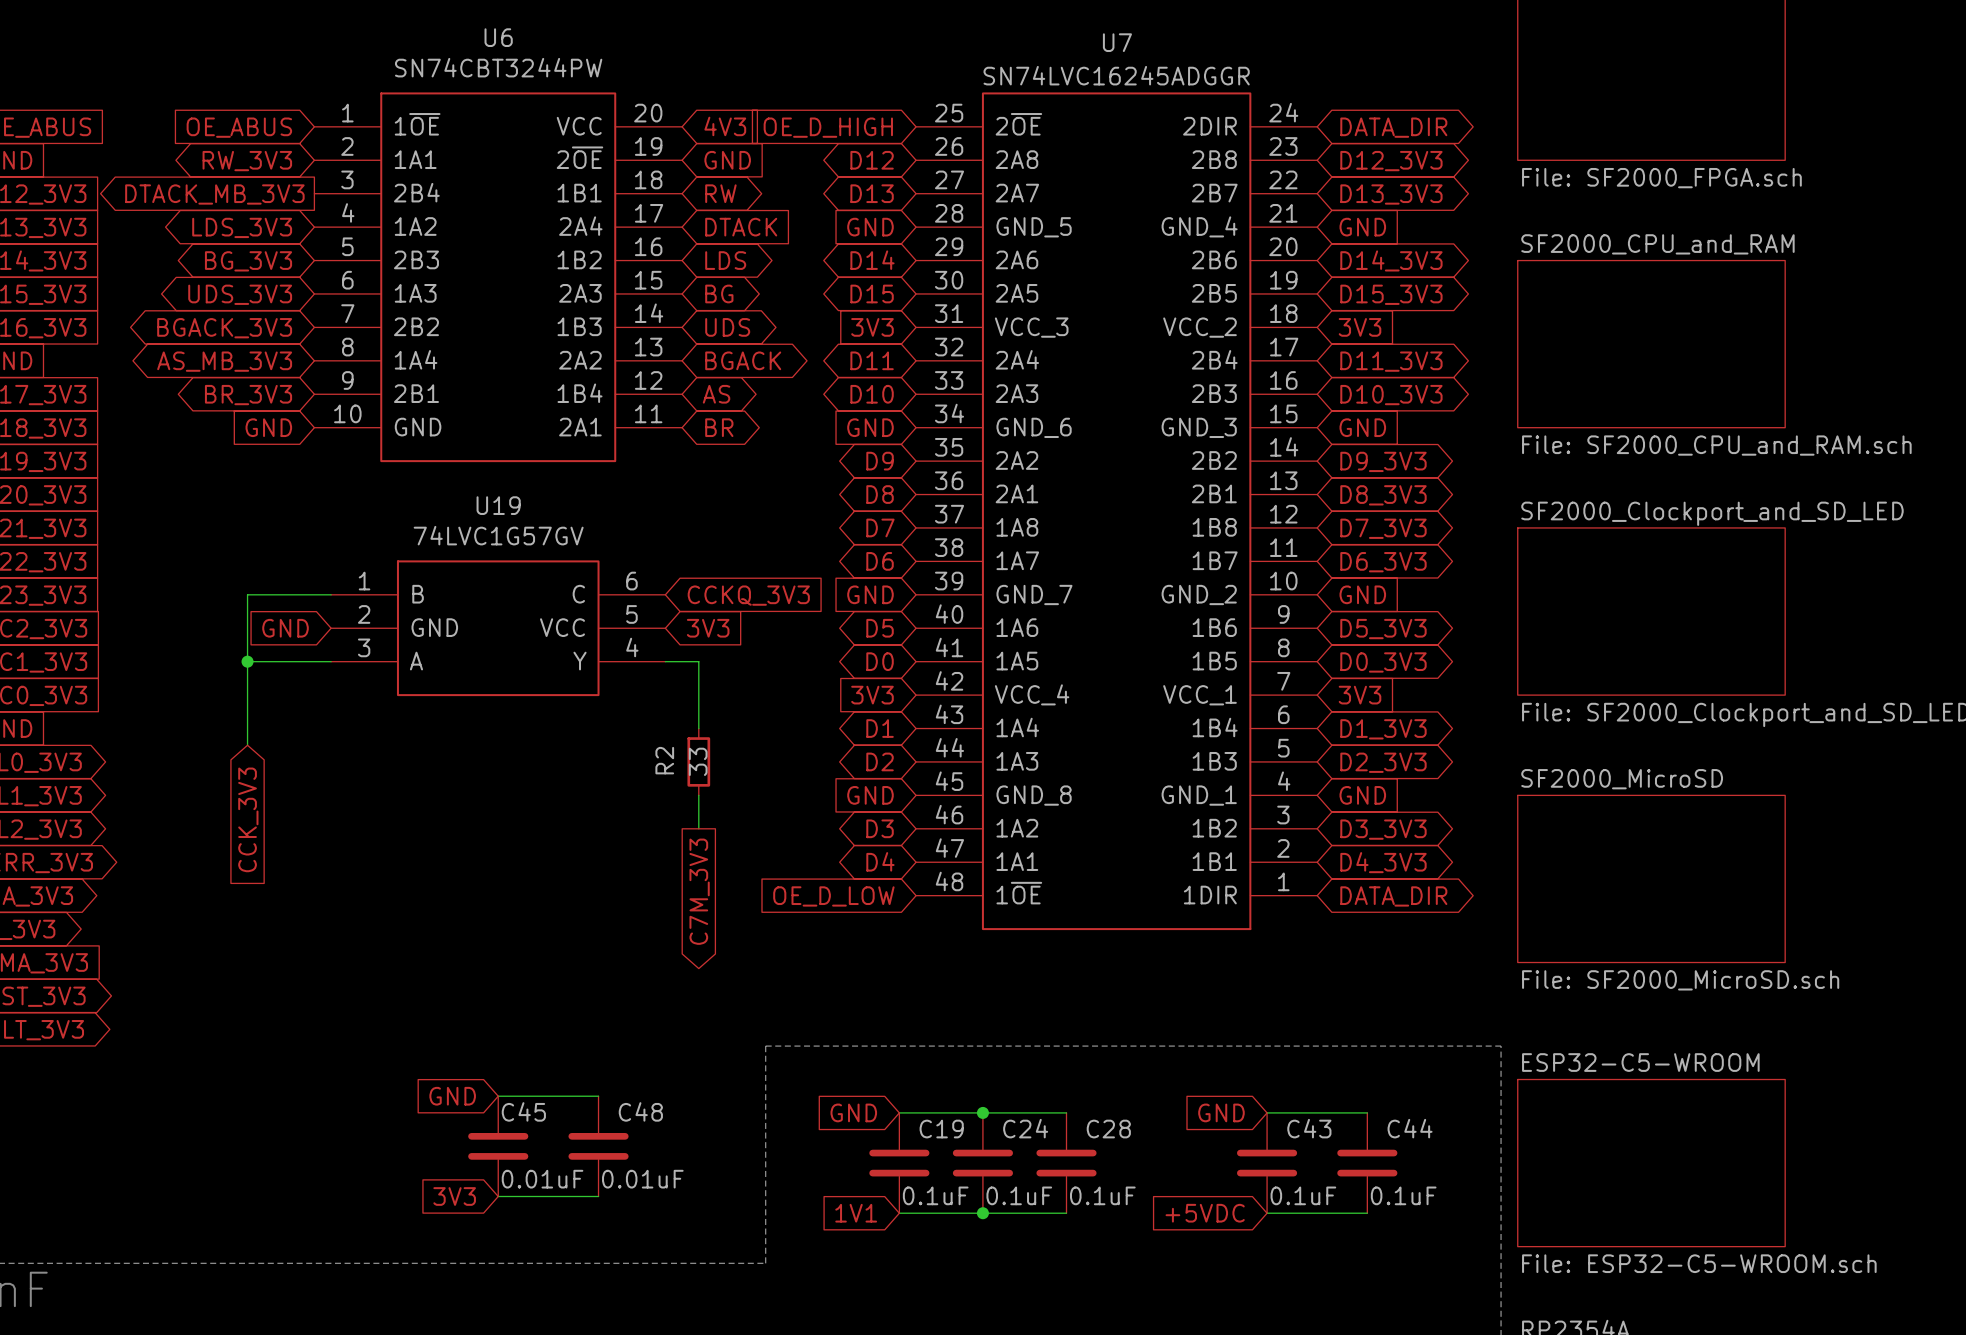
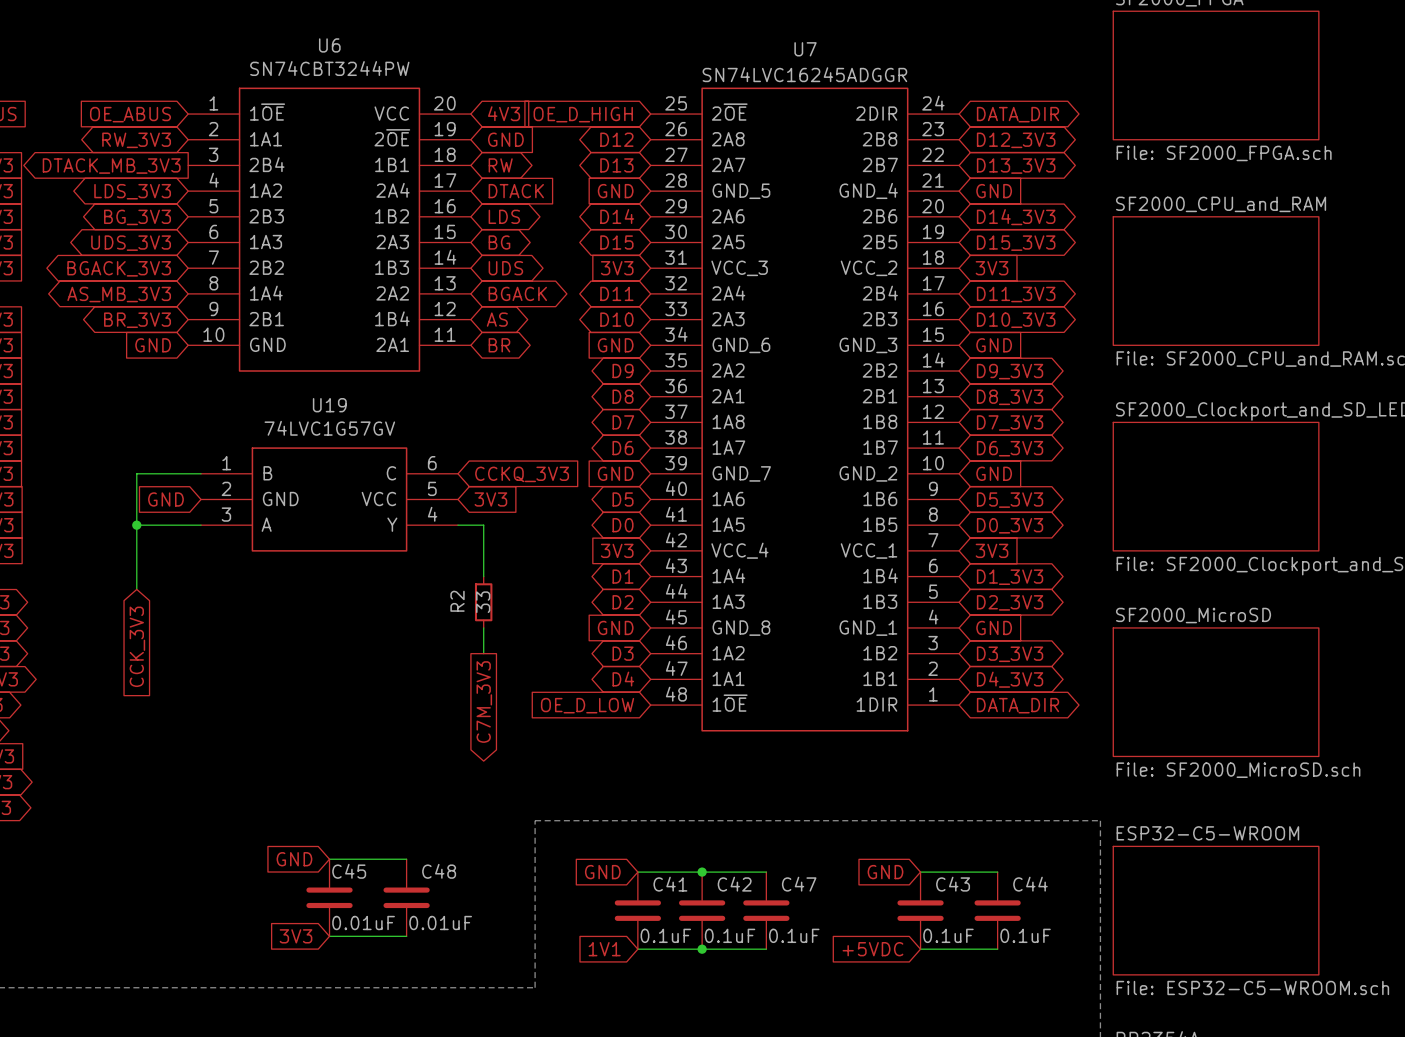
C24 name: C24 (1025, 1128) -> C42 (734, 884)
C19 name: C19 (941, 1129) -> C41 (670, 884)
C28 name: C28 (1108, 1129) -> C47 (799, 884)

